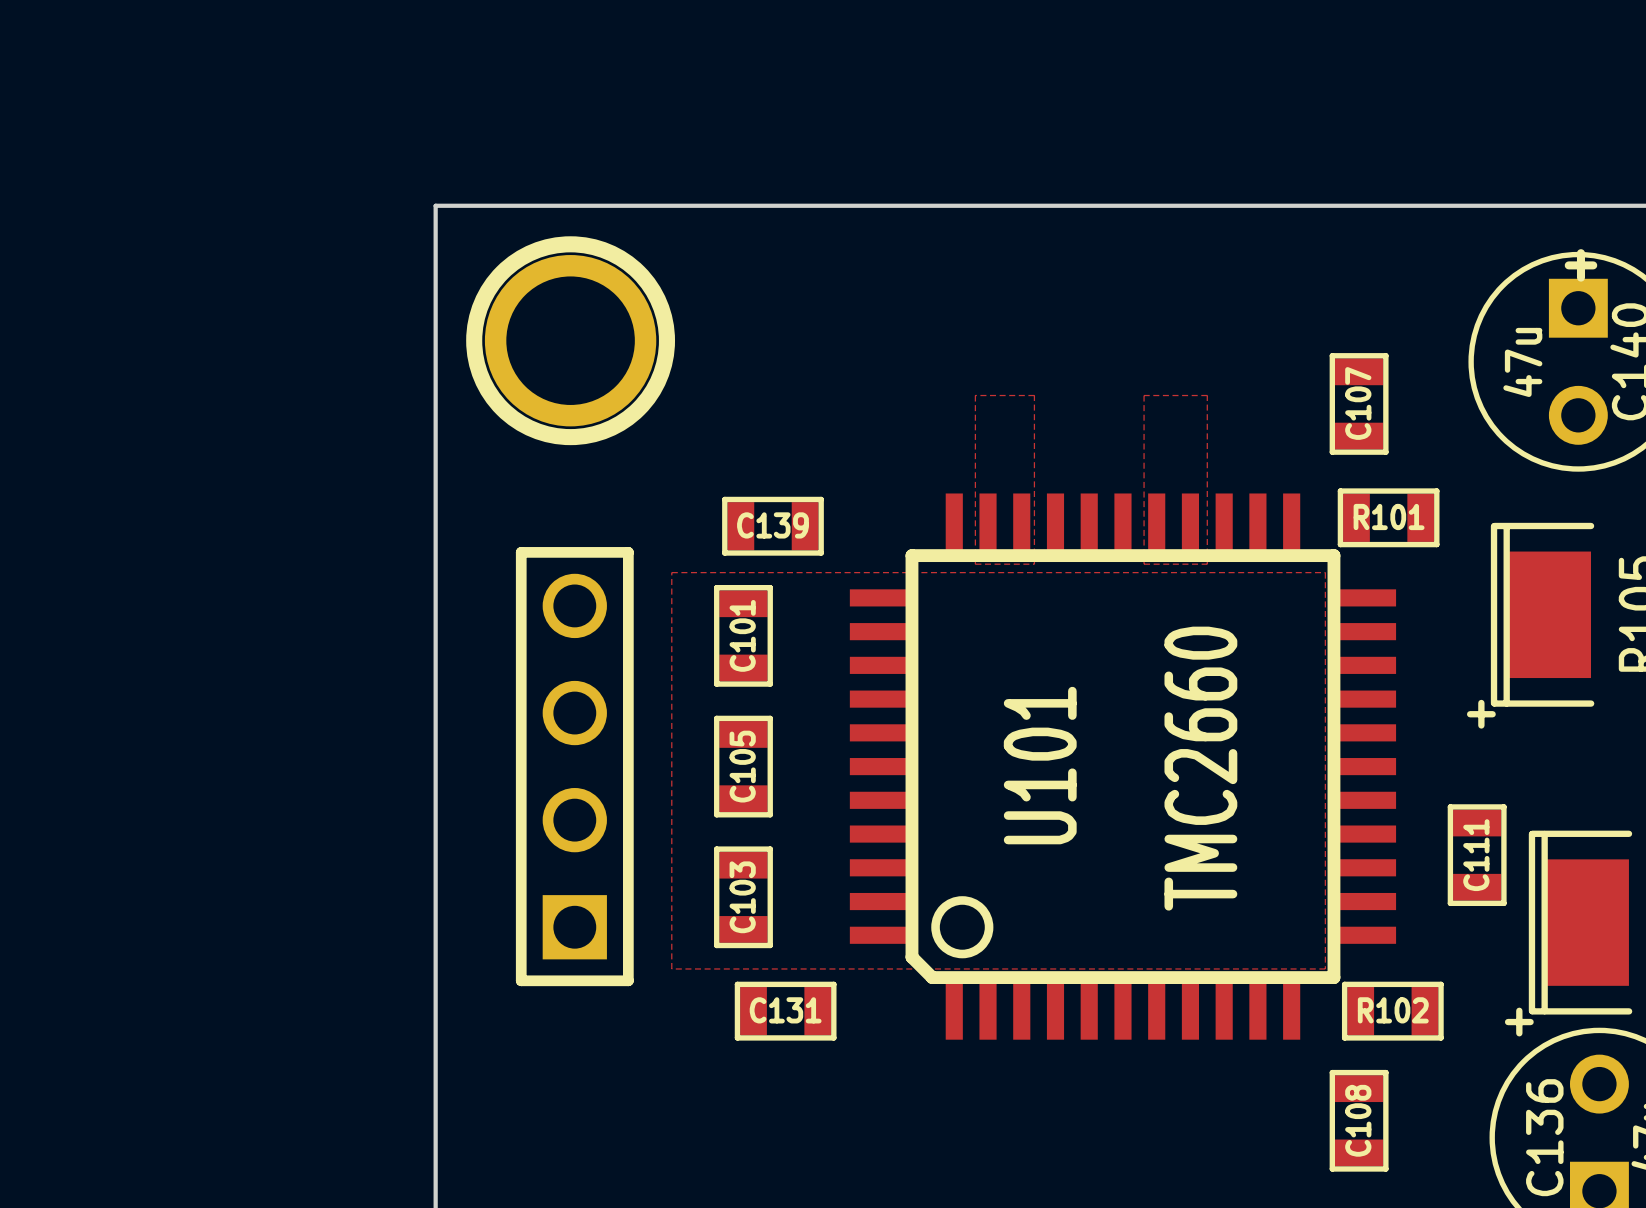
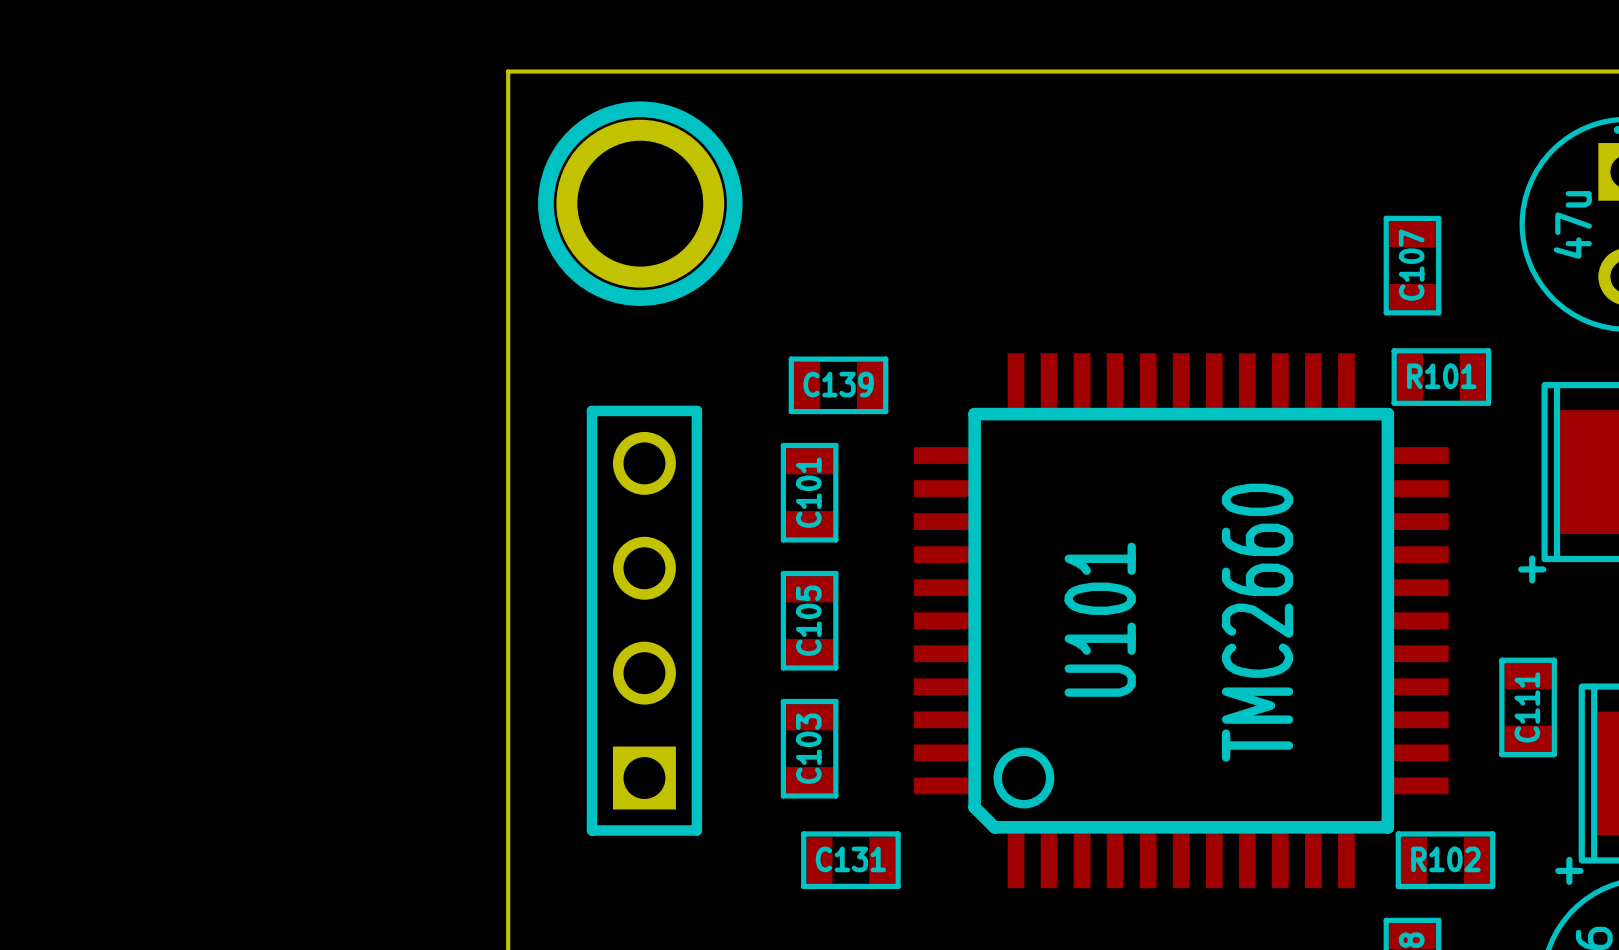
zone outline: (975, 395) (1034, 395) (1034, 564) (975, 564) (975, 395) -> none
zone outline: (1144, 395) (1207, 395) (1207, 564) (1144, 564) (1144, 395) -> none
zone outline: (671, 572) (1325, 572) (1325, 968) (671, 968) (671, 572) -> none

